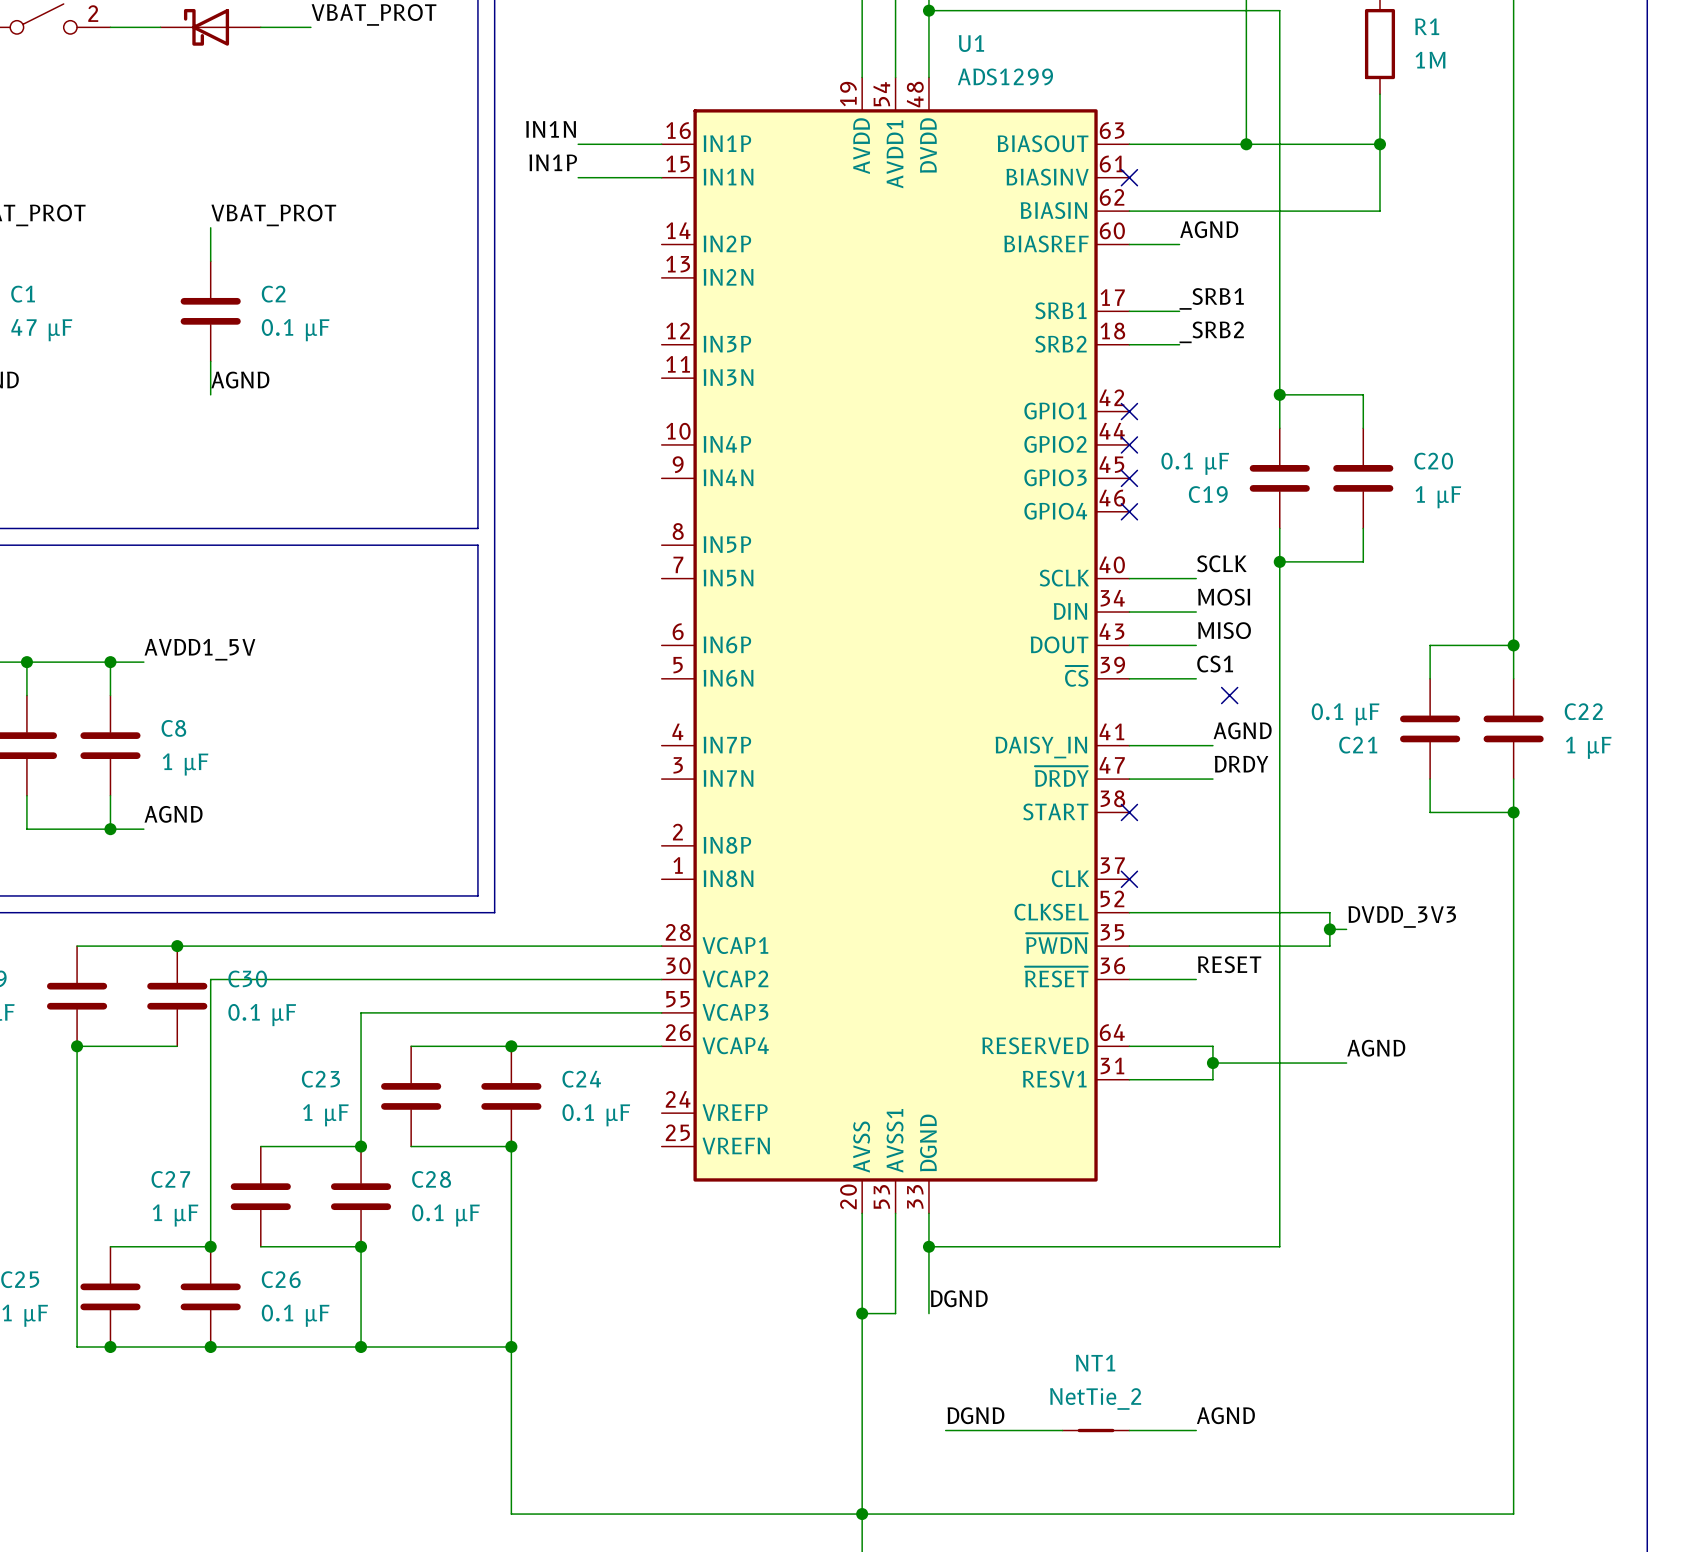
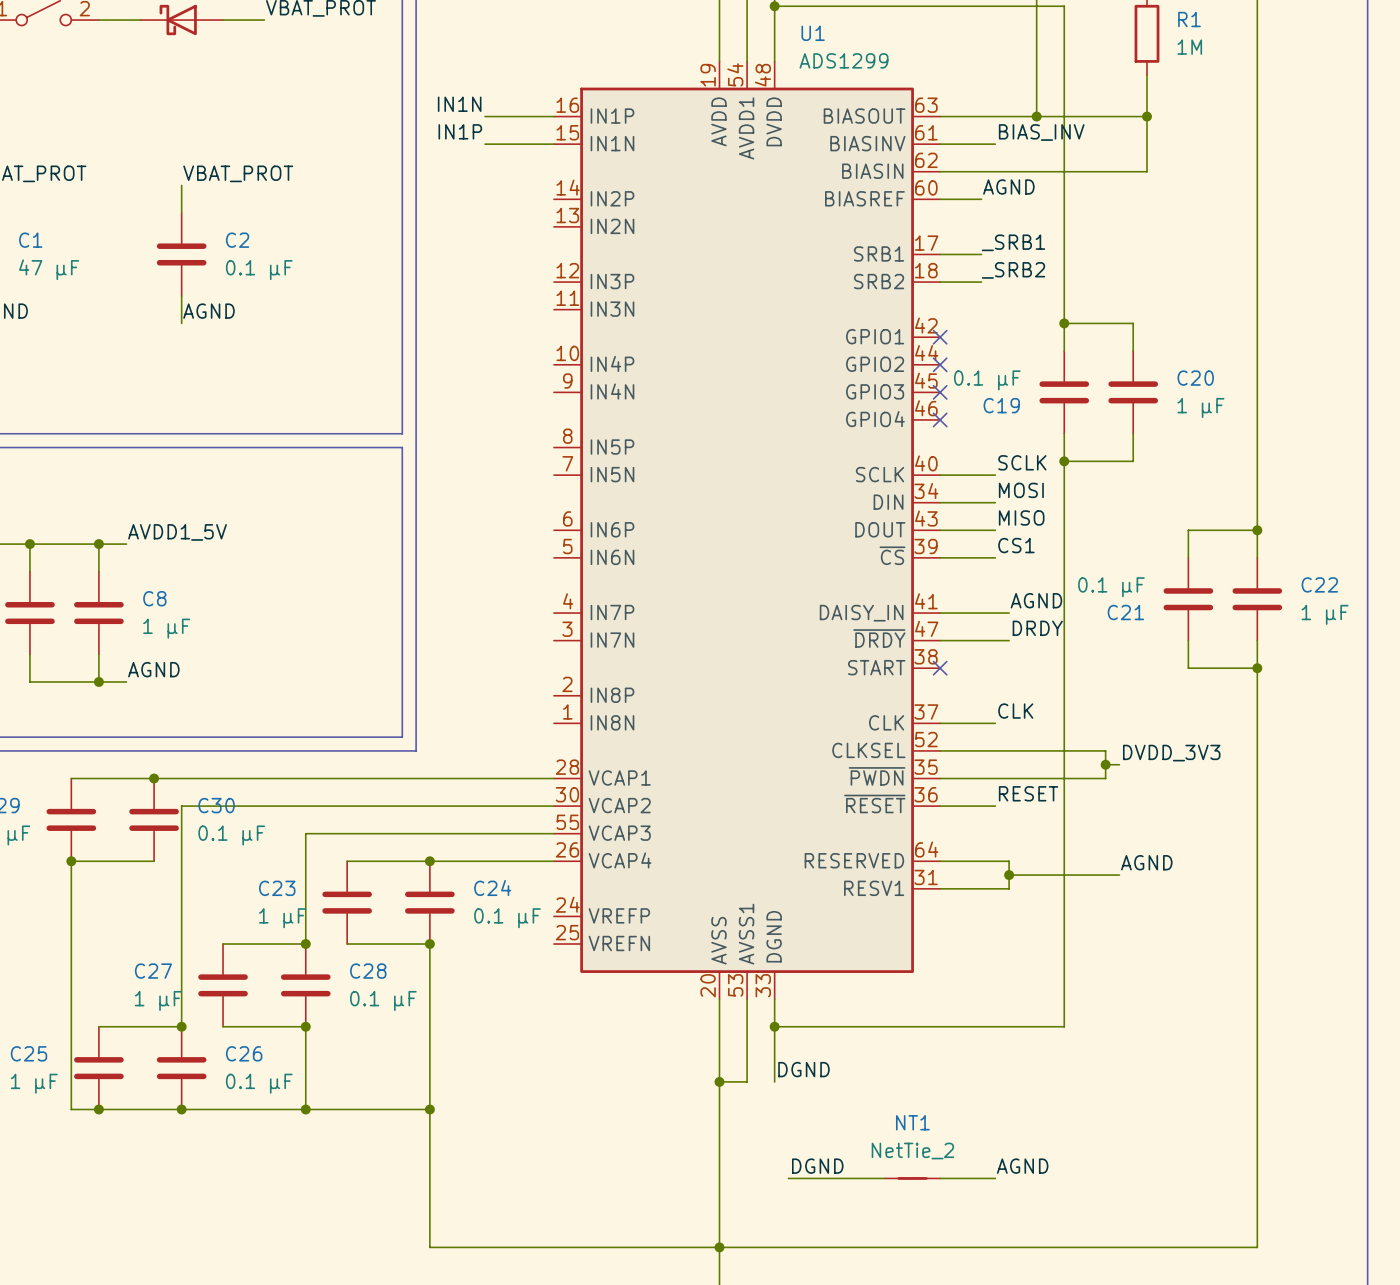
label: none -> BIAS_INV (1041, 132)
wire: none -> (940, 144) (995, 144)
no-connect mark: (1129, 177) -> none
no-connect mark: (1229, 695) -> none
label: none -> CLK (1015, 711)
wire: none -> (940, 723) (995, 723)
no-connect mark: (1129, 879) -> none

